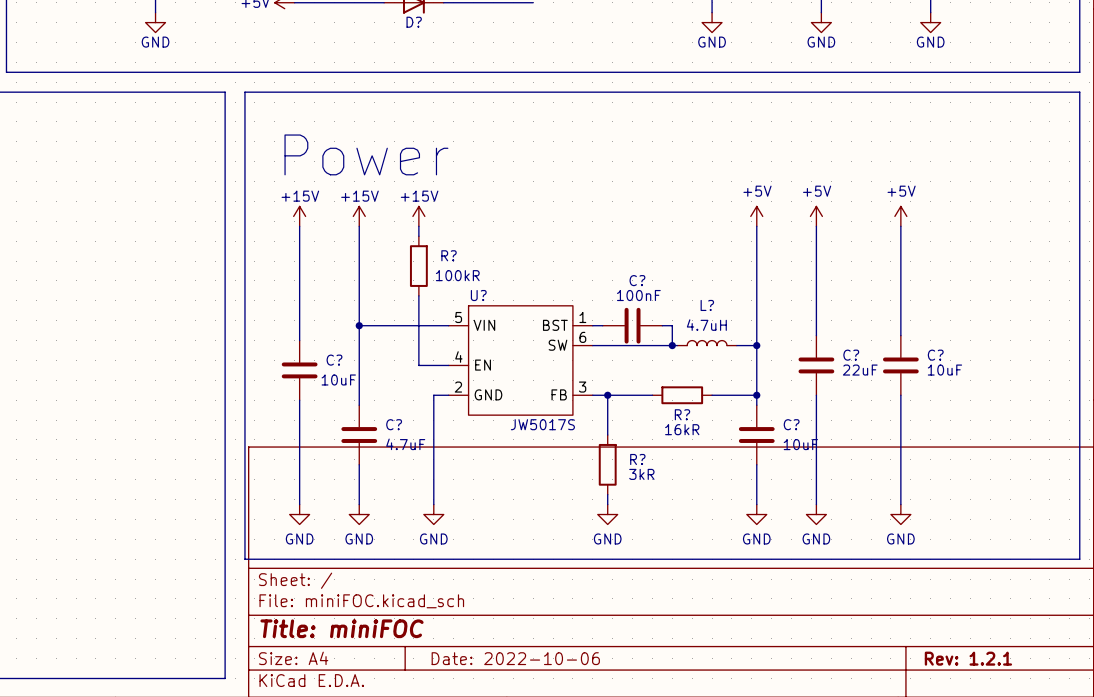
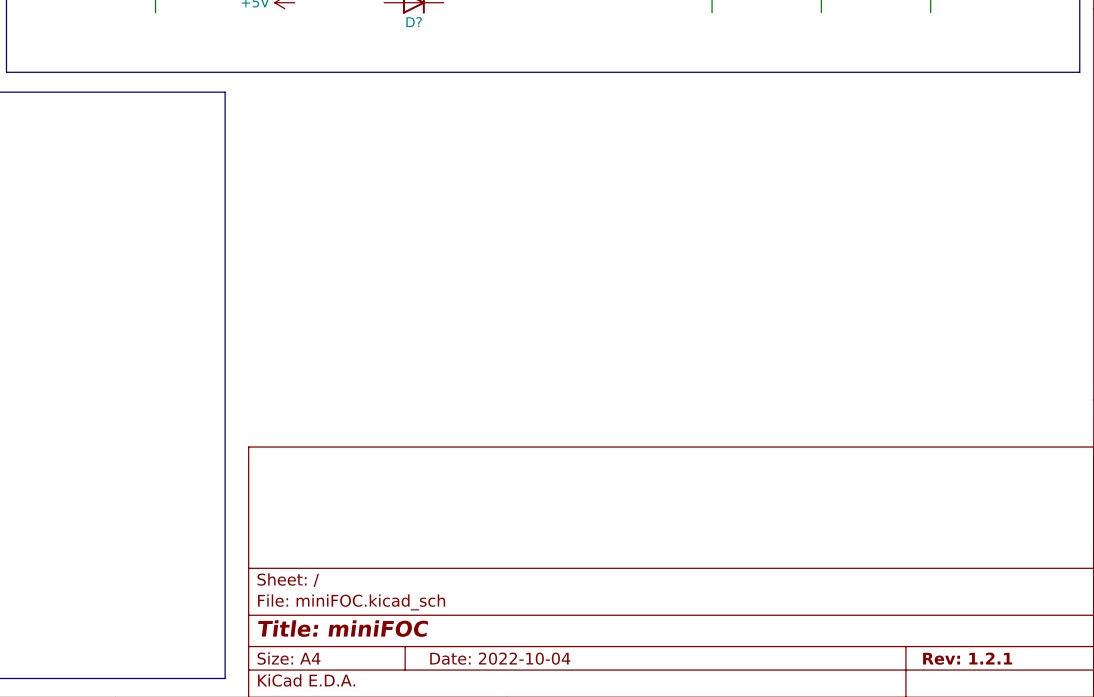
wire: (294, 2) (384, 2) -> none
wire: (443, 2) (533, 2) -> none
power symbol: GND (155, 22) -> none
power symbol: GND (712, 22) -> none
power symbol: GND (821, 22) -> none
power symbol: GND (930, 22) -> none
line: (244, 92) (1079, 92) (1079, 559) (244, 559) (244, 92) -> none
text: Power (366, 154) -> none
power symbol: +15V (299, 216) -> none
power symbol: +15V (359, 216) -> none
power symbol: +15V (418, 216) -> none
power symbol: +5V (756, 216) -> none
power symbol: +5V (816, 216) -> none
power symbol: +5V (900, 216) -> none
wire: (299, 226) (299, 340) -> none
wire: (359, 226) (359, 405) -> none
wire: (418, 226) (418, 236) -> none
wire: (756, 226) (756, 405) -> none
wire: (816, 226) (816, 335) -> none
wire: (900, 226) (900, 335) -> none
R?: 100kR (418, 266) -> none
wire: (418, 295) (418, 365) (448, 365) -> none
wire: (359, 325) (448, 325) -> none
junction: (359, 325) -> none
wire: (592, 325) (602, 325) -> none
C?: 100nF (632, 325) -> none
wire: (662, 325) (672, 325) (672, 345) -> none
L?: 4.7uH (707, 343) -> none
wire: (592, 345) (677, 345) -> none
junction: (672, 345) -> none
wire: (736, 345) (756, 345) -> none
junction: (756, 345) -> none
U?: JW5017S (520, 360) -> none
C?: 22uF (816, 365) -> none
C?: 10uF (900, 365) -> none
C?: 10uF (299, 370) -> none
wire: (448, 395) (433, 395) (433, 504) -> none
wire: (592, 395) (652, 395) -> none
wire: (607, 395) (607, 435) -> none
junction: (607, 395) -> none
R?: 16kR (682, 395) -> none
wire: (712, 395) (756, 395) -> none
junction: (756, 395) -> none
wire: (816, 395) (816, 504) -> none
wire: (900, 395) (900, 504) -> none
wire: (299, 400) (299, 504) -> none
C?: 4.7uF (359, 435) -> none
C?: 10uF (756, 435) -> none
wire: (359, 464) (359, 504) -> none
R?: 3kR (607, 464) -> none
wire: (756, 464) (756, 504) -> none
wire: (607, 494) (607, 504) -> none
power symbol: GND (299, 514) -> none
power symbol: GND (359, 514) -> none
power symbol: GND (433, 514) -> none
power symbol: GND (607, 514) -> none
power symbol: GND (756, 514) -> none
power symbol: GND (816, 514) -> none
power symbol: GND (900, 514) -> none
title block: Date: 2022-10-06 (515, 658) -> Date: 2022-10-04 (500, 658)

